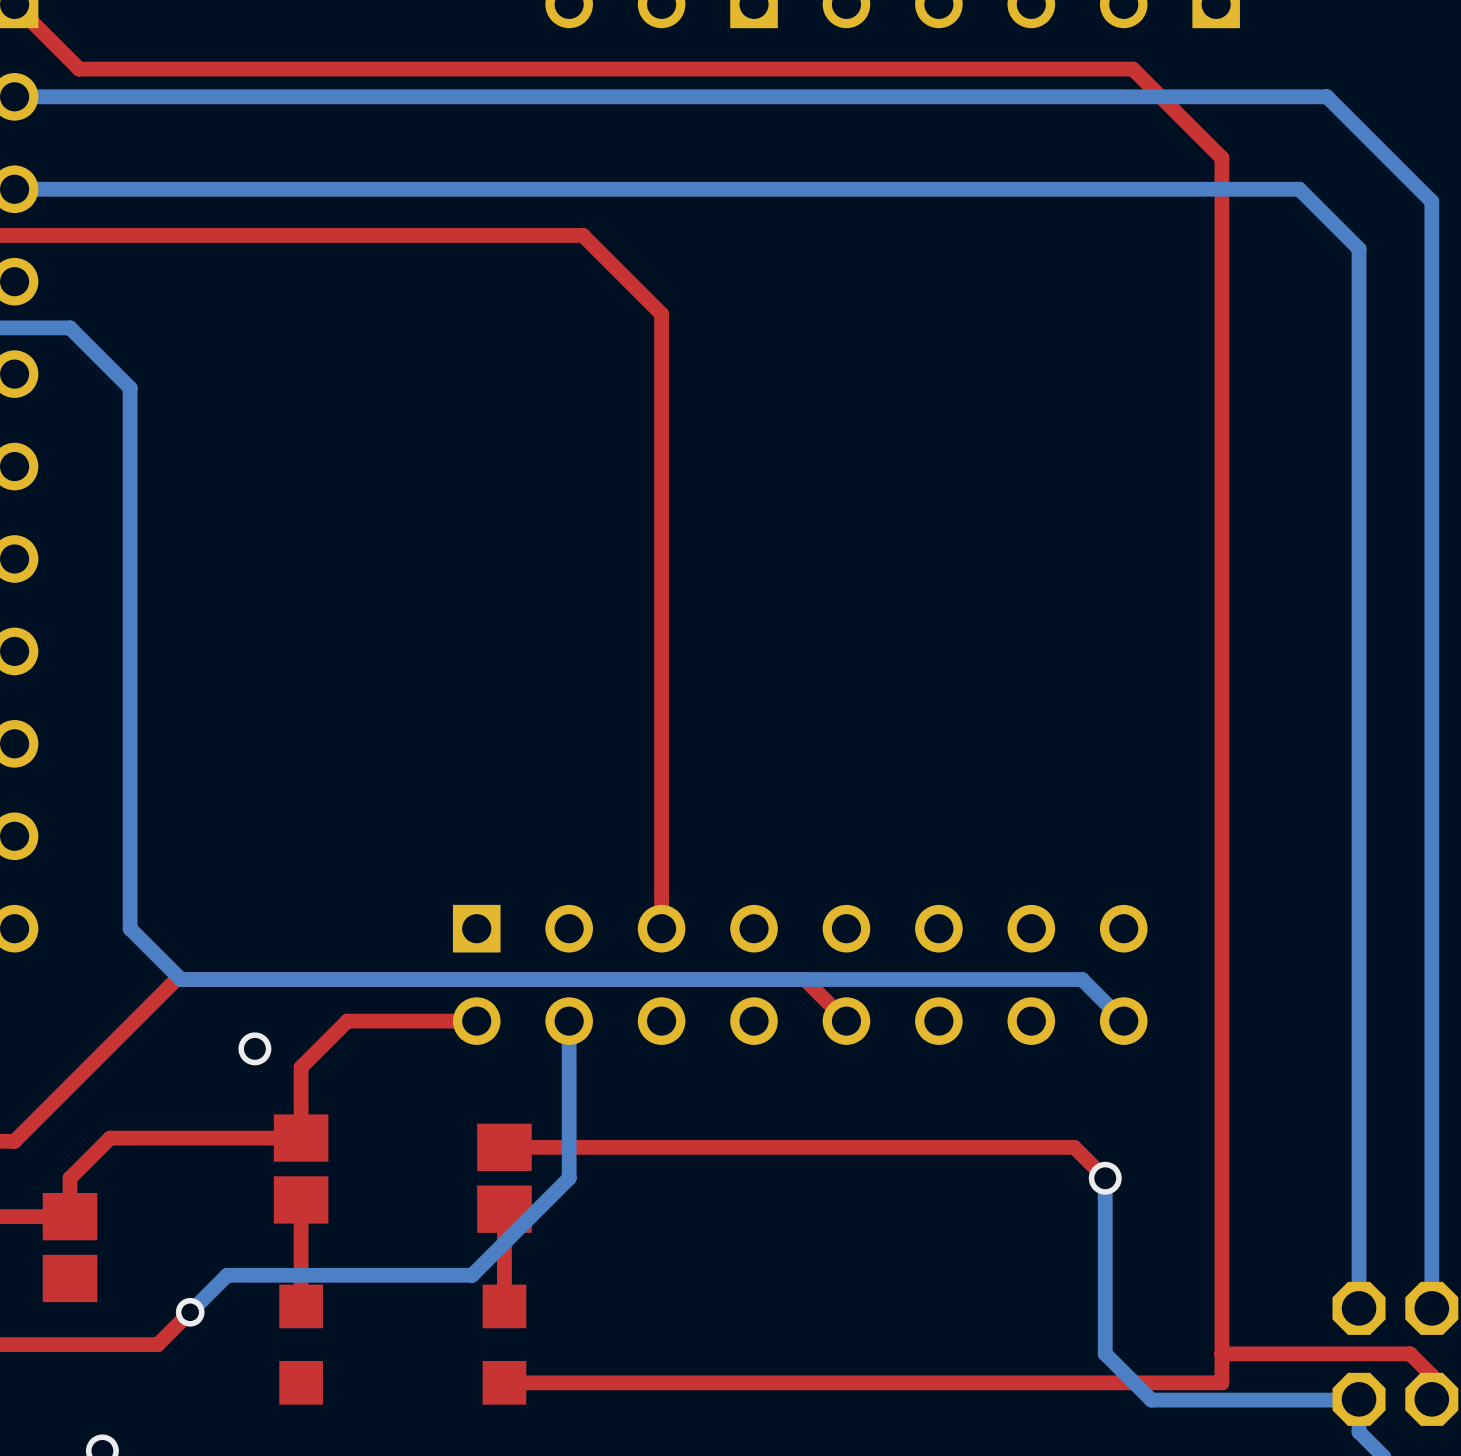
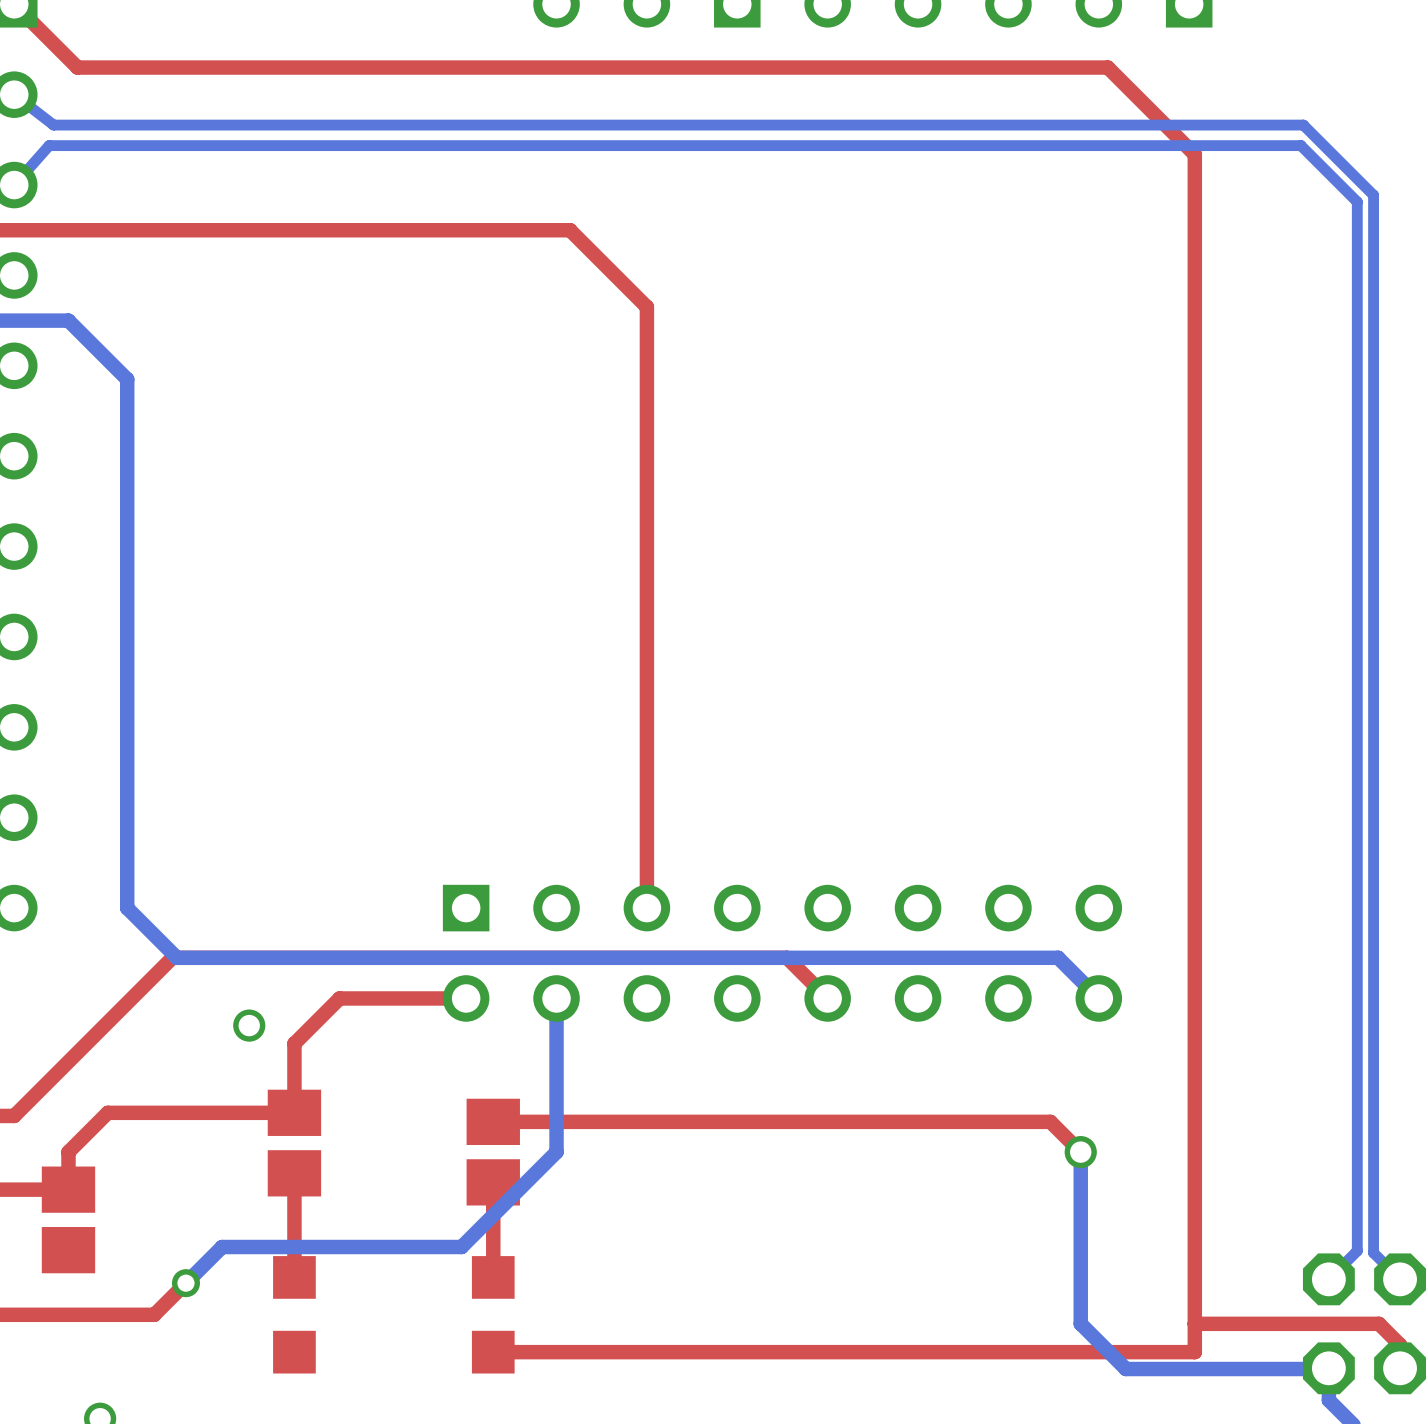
bottom track: (14, 96) (1327, 96) (1431, 201) (1431, 1308) -> (14, 94) (53, 125) (1303, 125) (1373, 195) (1373, 1252) (1400, 1279)
bottom track: (14, 189) (1299, 189) (1359, 248) (1359, 1308) -> (14, 185) (49, 145) (1300, 145) (1357, 201) (1357, 1250) (1328, 1279)

